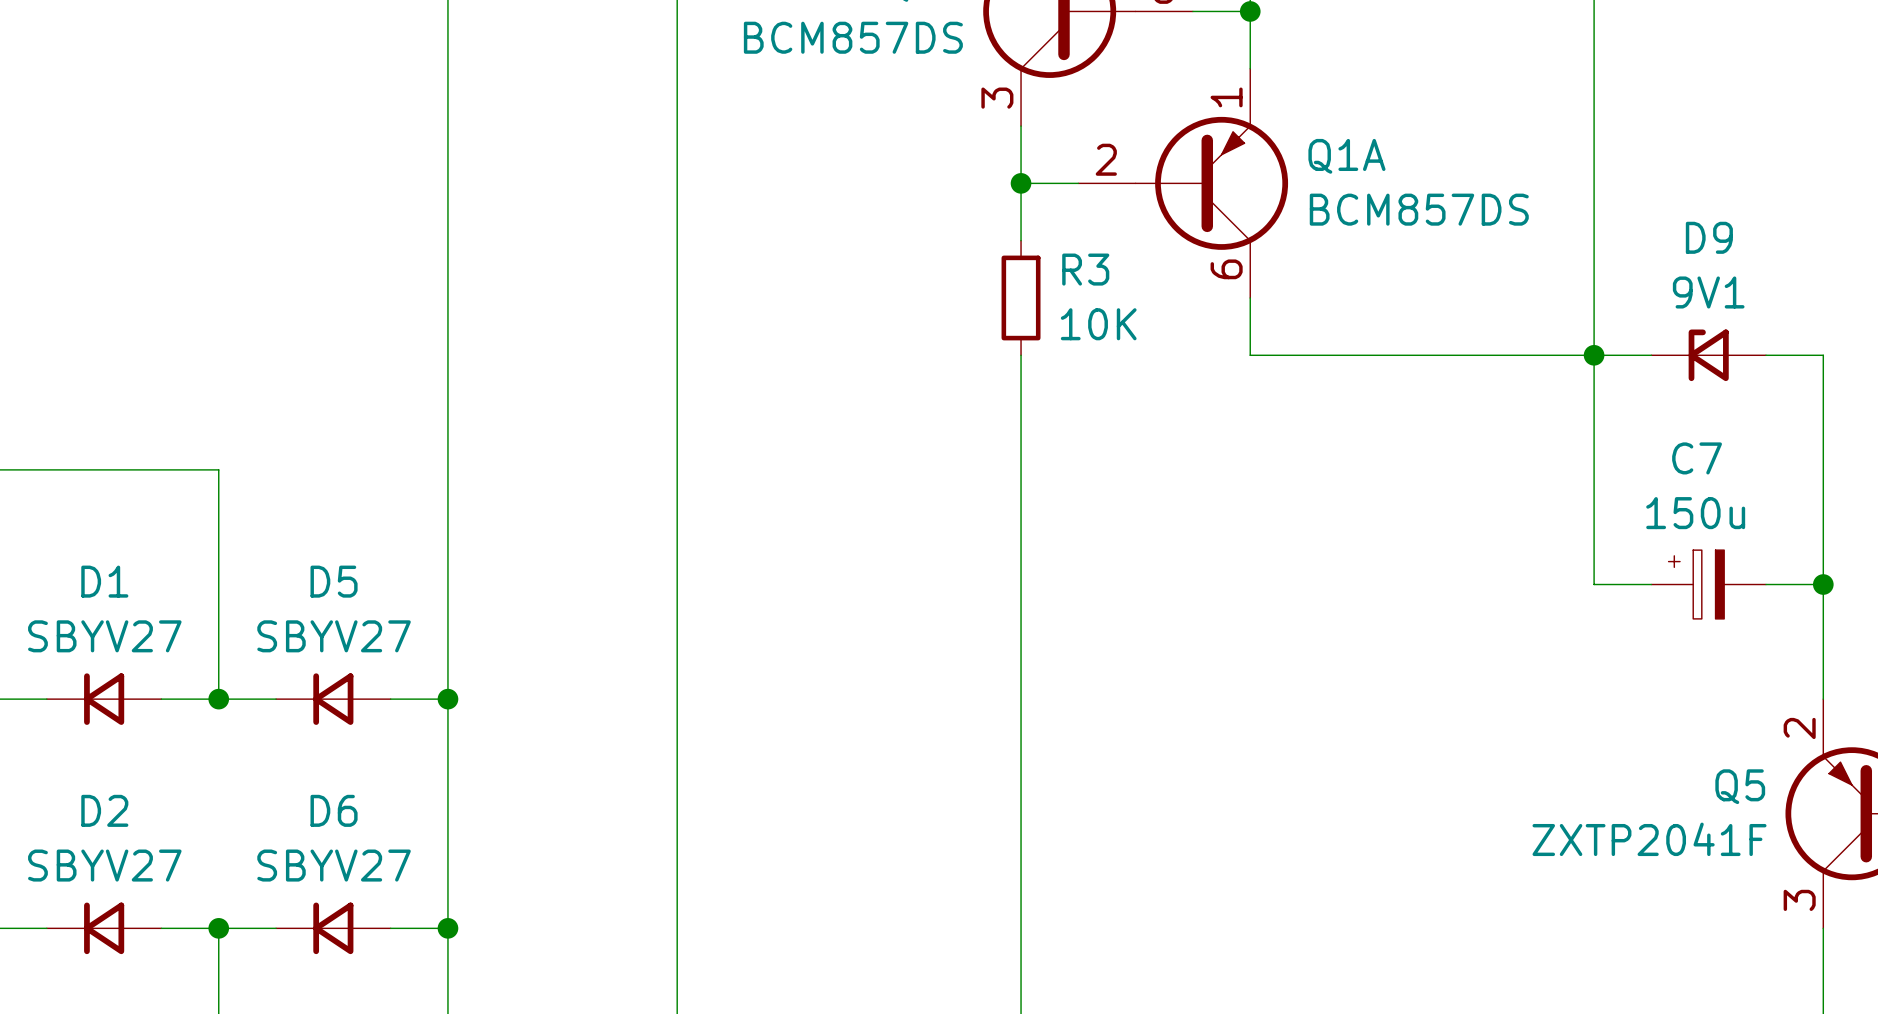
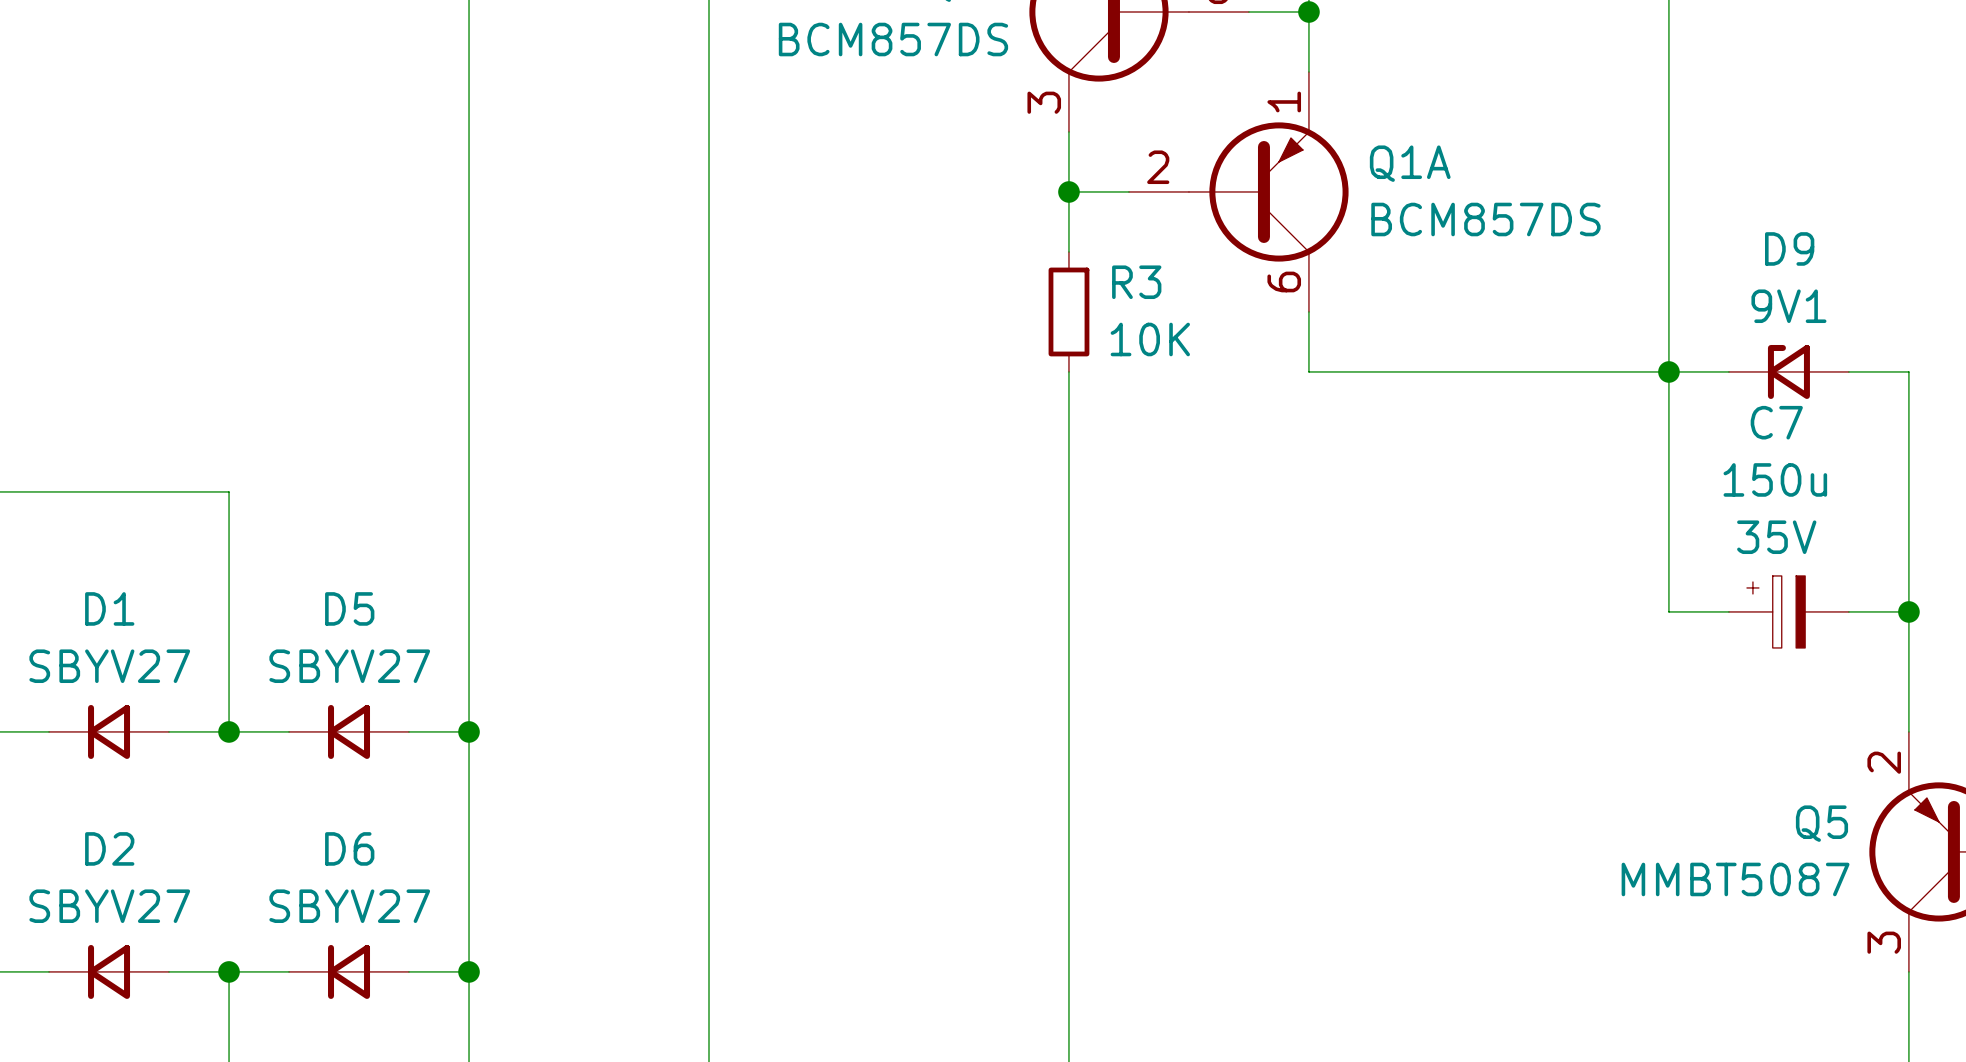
C7 name position: C7 (1697, 458) -> C7 (1776, 422)
C7 value position: 150u (1695, 513) -> 150u (1775, 479)
C7 text: none -> 35V (1776, 537)
Q5 value: ZXTP2041F (1649, 839) -> MMBT5087 (1735, 879)

